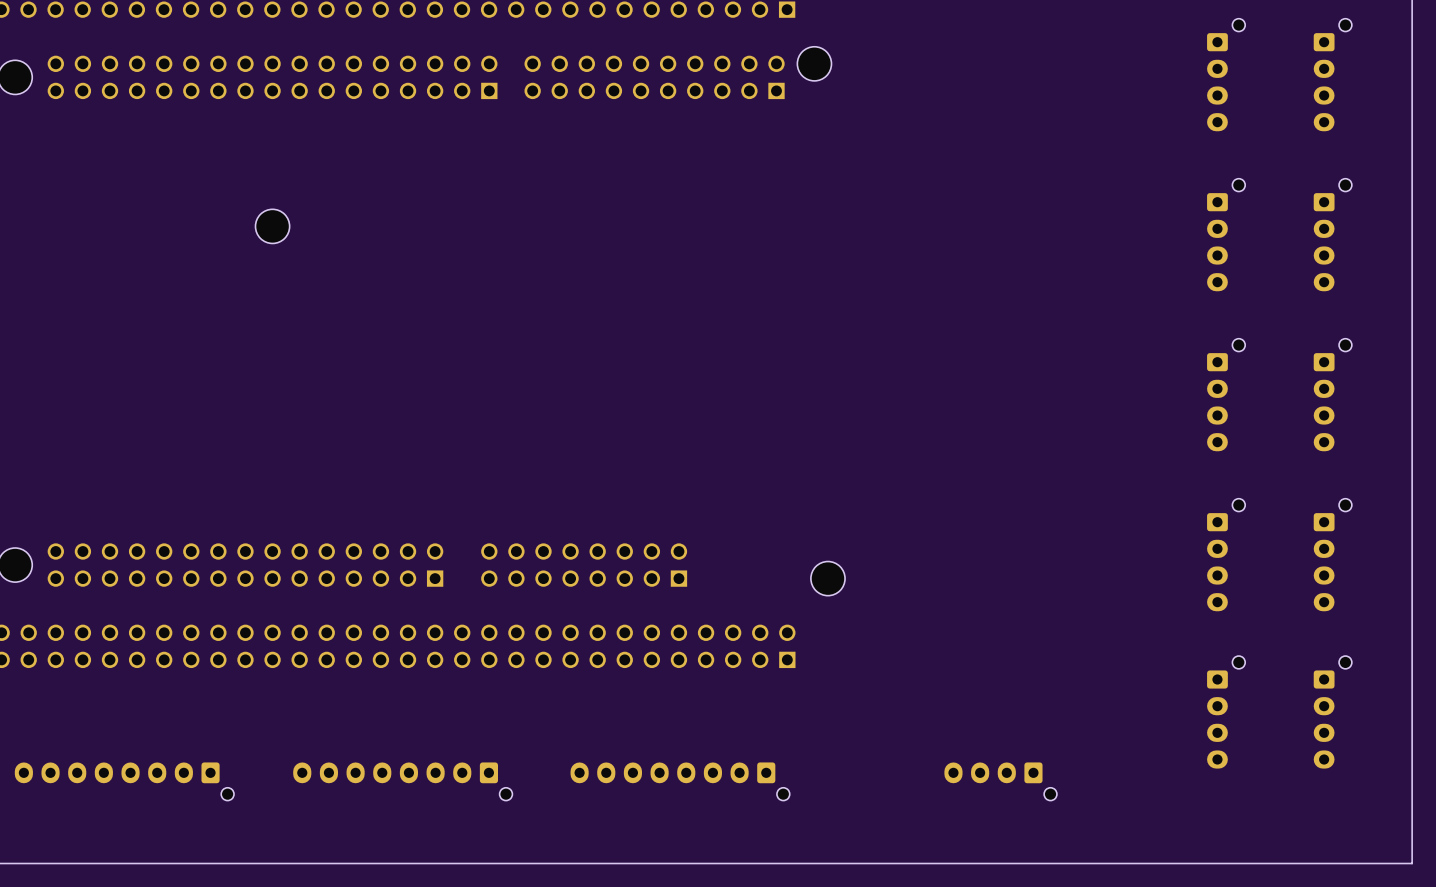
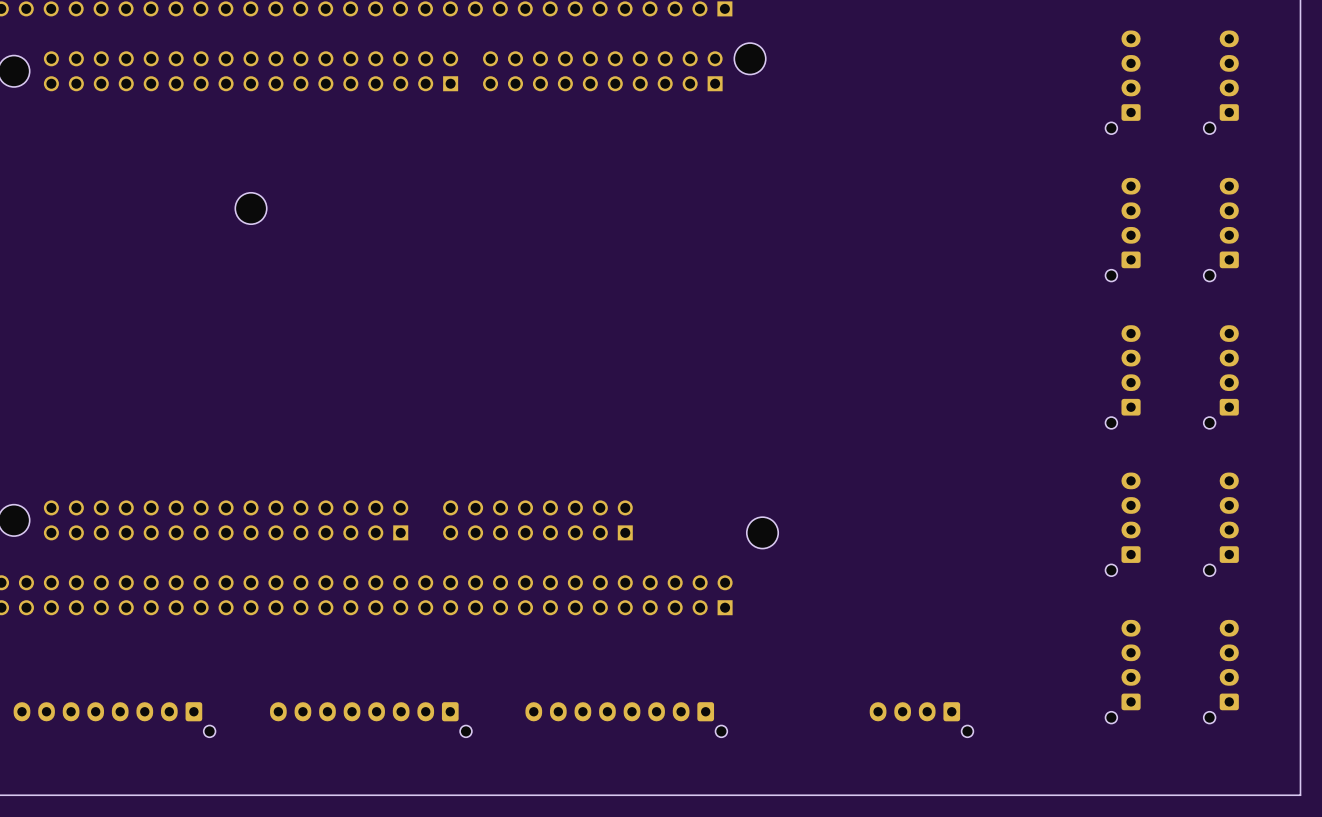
part rotation: 0° (1226, 74) -> 180° (1123, 82)
part rotation: 0° (1332, 74) -> 180° (1221, 82)
part rotation: 0° (1226, 234) -> 180° (1123, 229)
part rotation: 0° (1332, 234) -> 180° (1221, 229)
part rotation: 0° (1226, 394) -> 180° (1123, 377)
part rotation: 0° (1332, 394) -> 180° (1221, 377)
part rotation: 0° (1226, 554) -> 180° (1123, 524)
part rotation: 0° (1332, 554) -> 180° (1221, 524)
part rotation: 0° (1226, 712) -> 180° (1123, 671)
part rotation: 0° (1332, 712) -> 180° (1221, 671)

